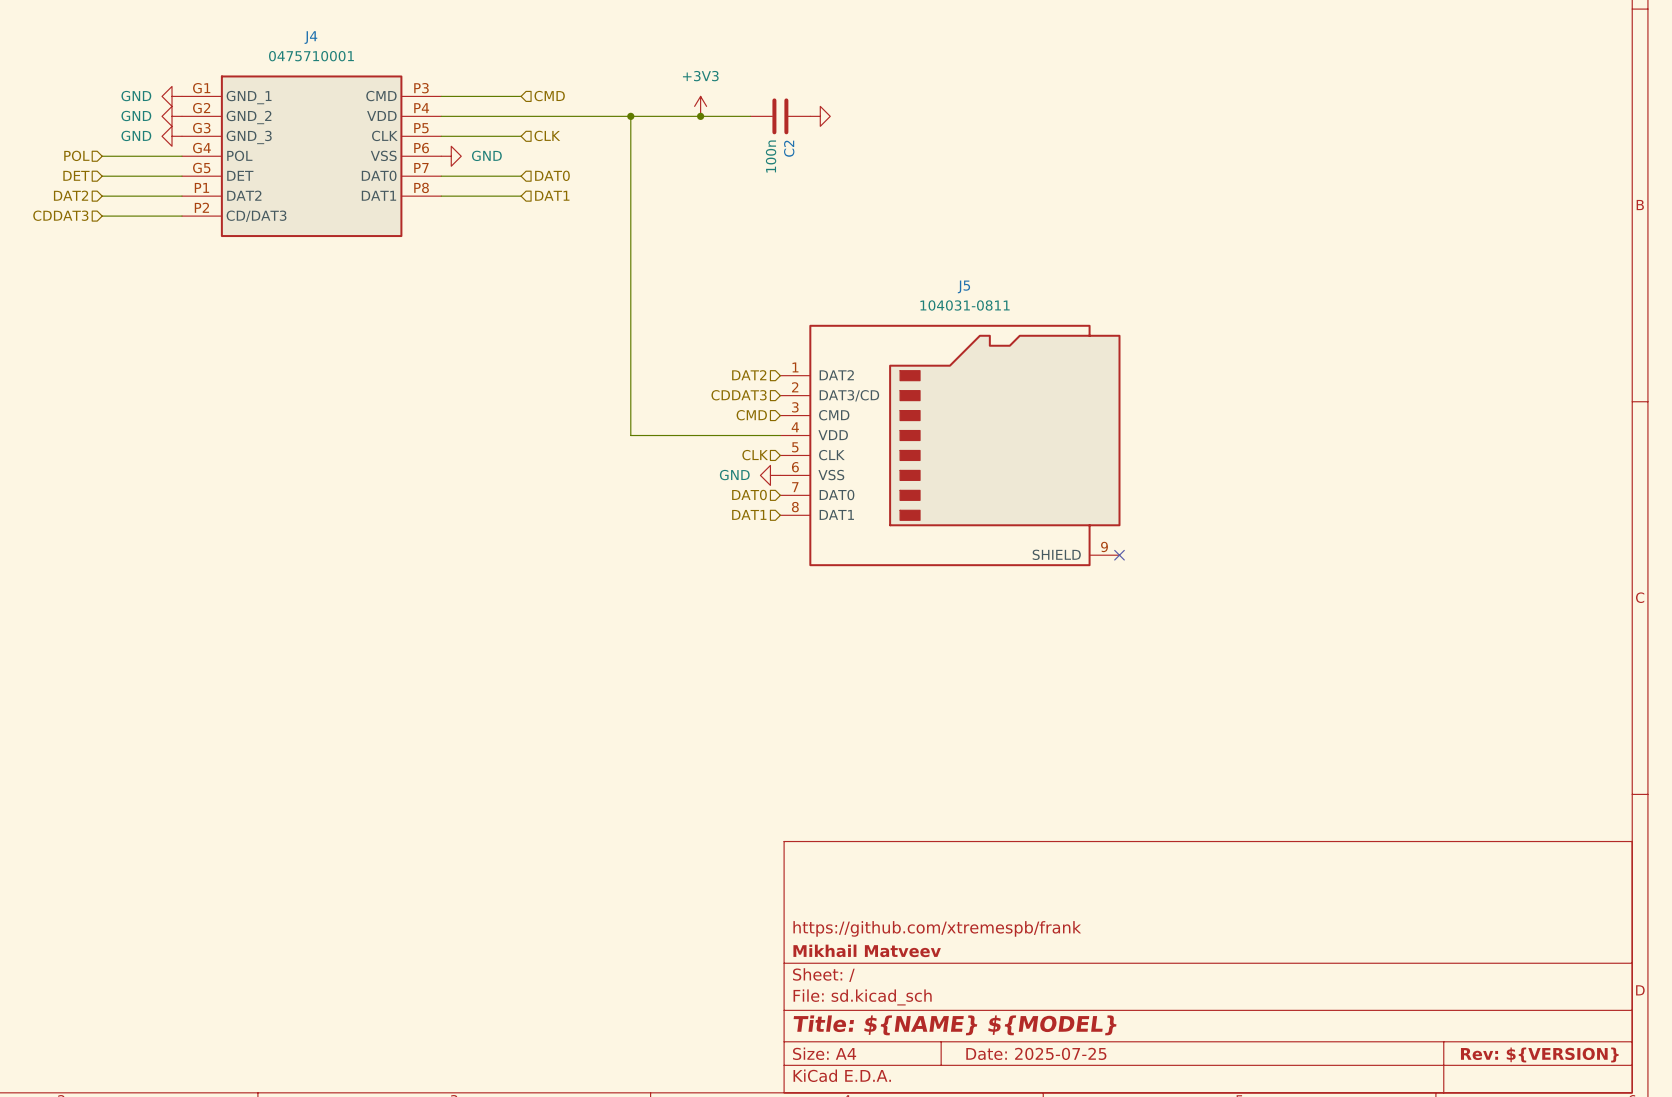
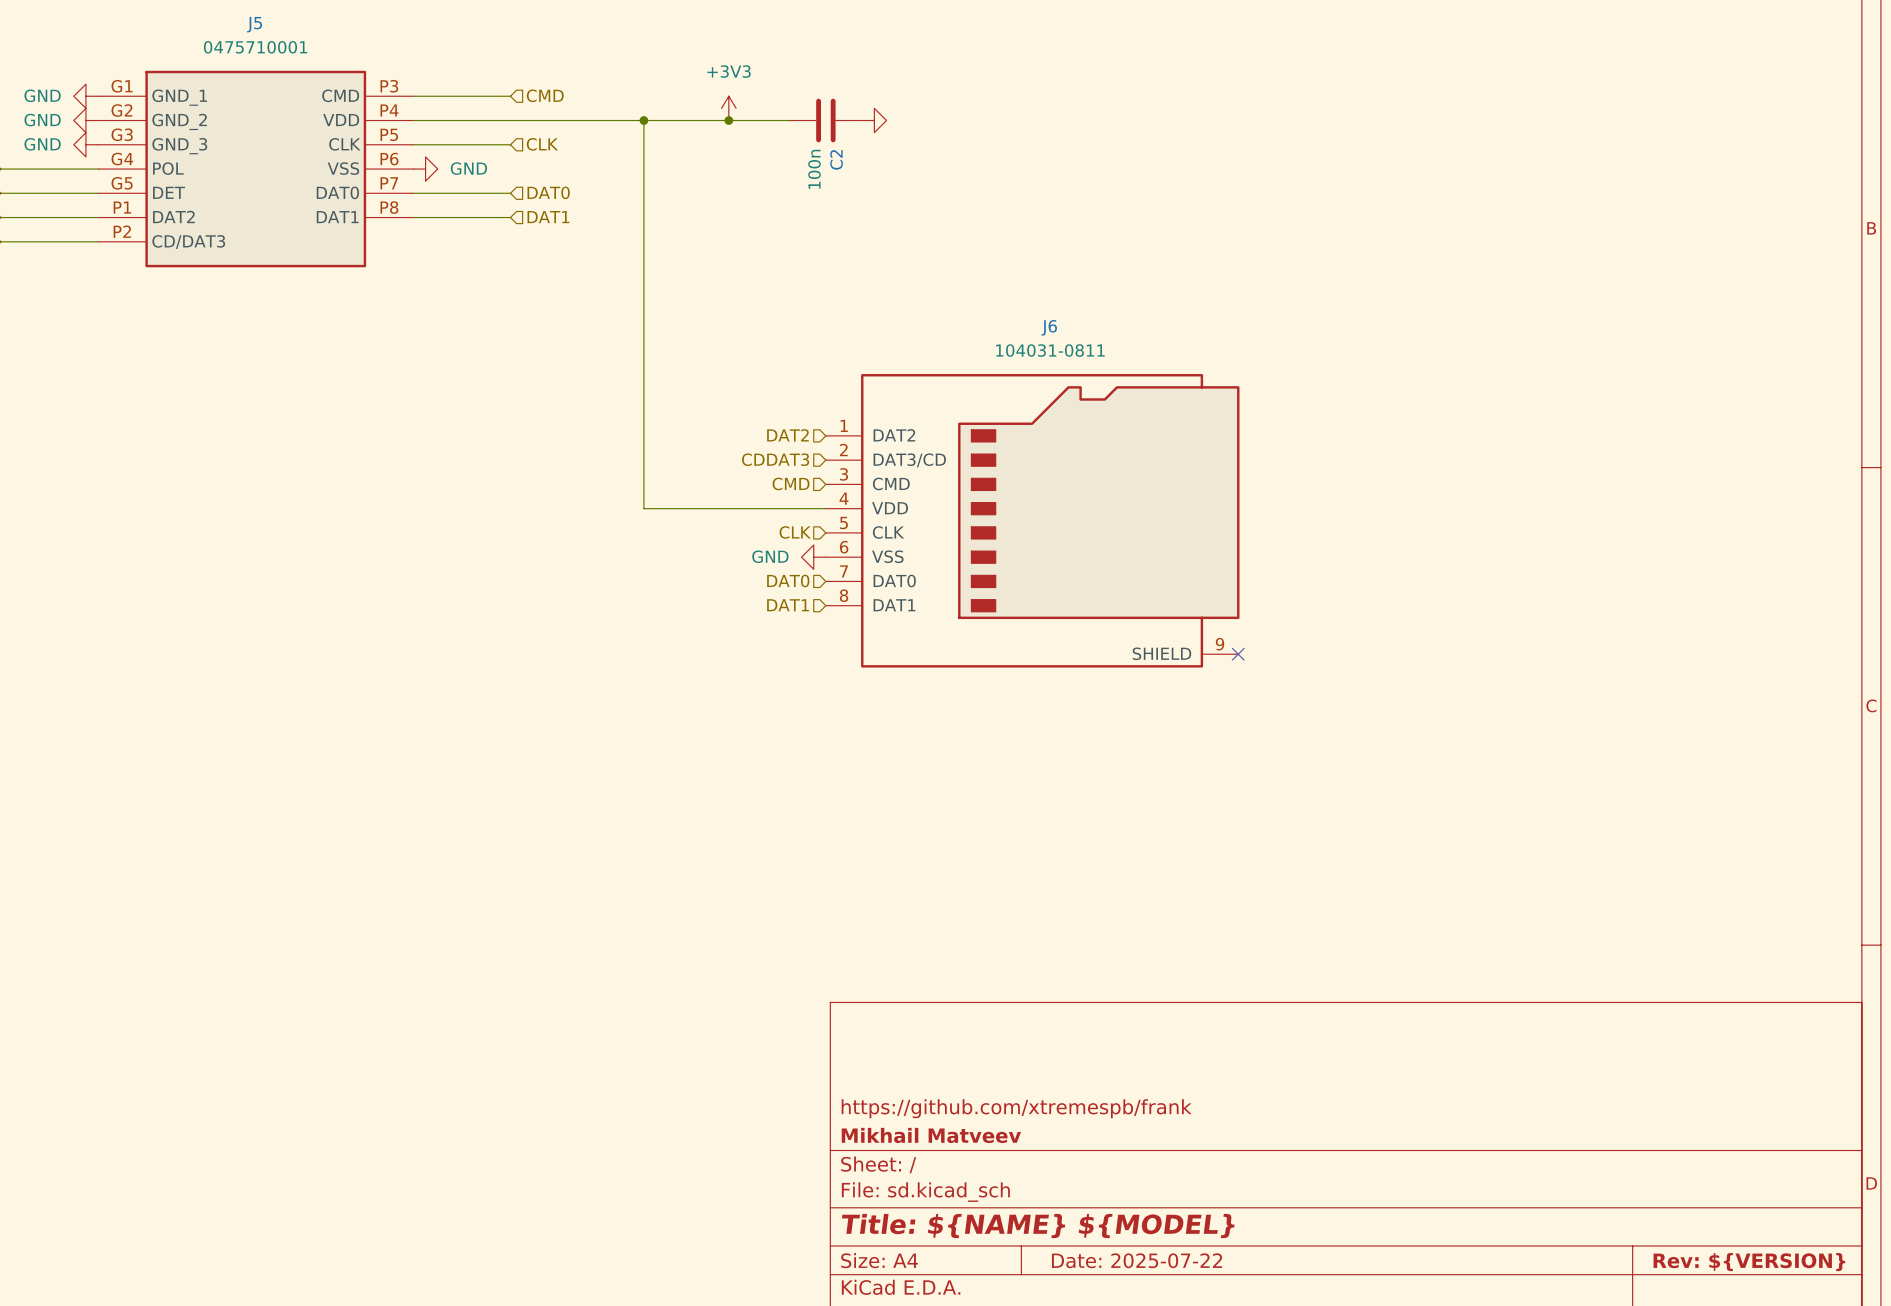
J4 name: J4 (310, 37) -> J5 (254, 24)
J5 name: J5 (963, 286) -> J6 (1049, 327)
title block: Date: 2025-07-25 (1036, 1053) -> Date: 2025-07-22 (1137, 1260)

